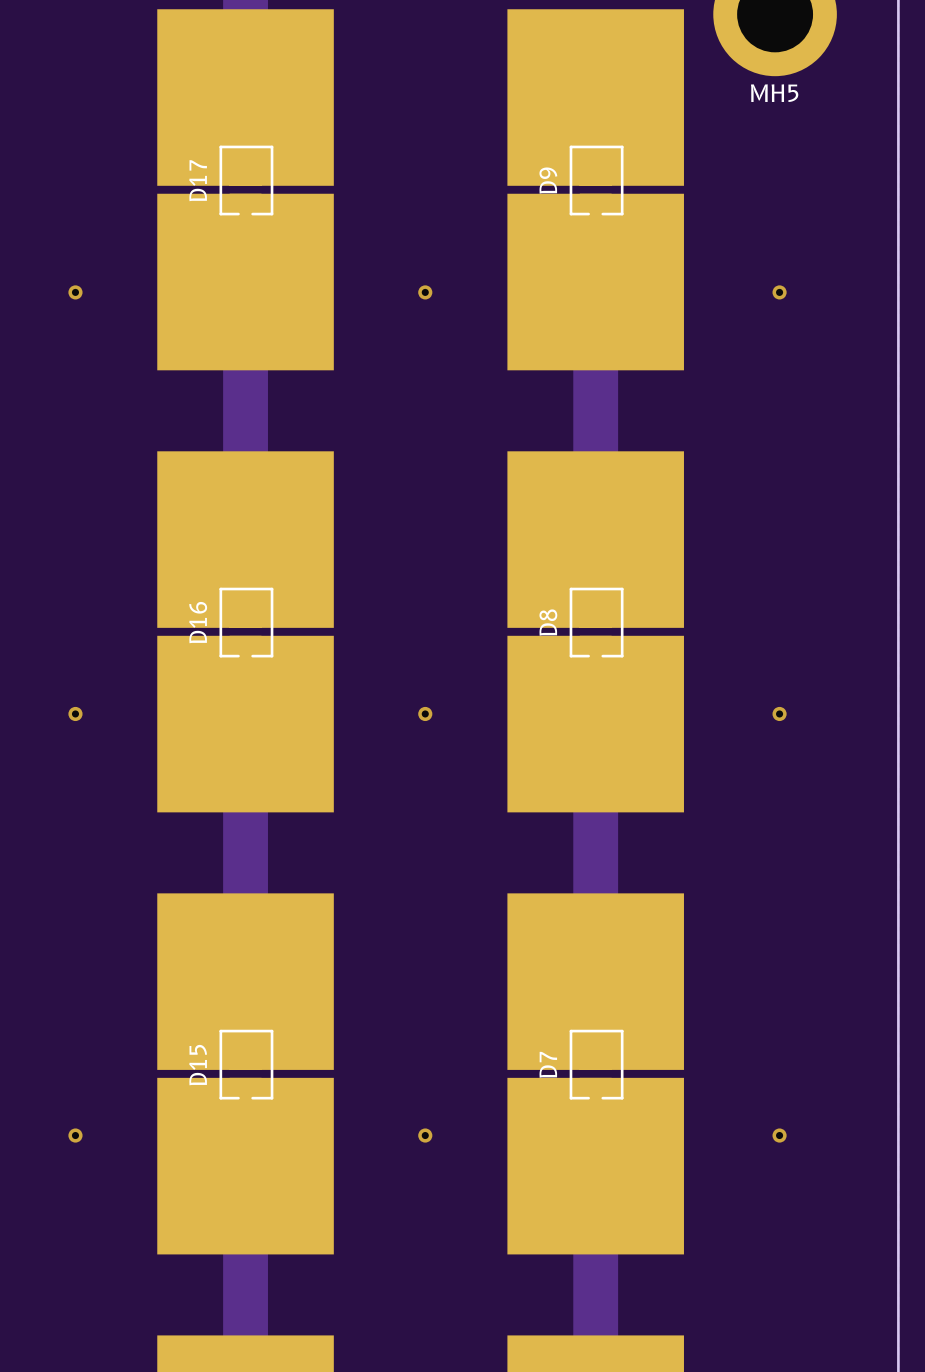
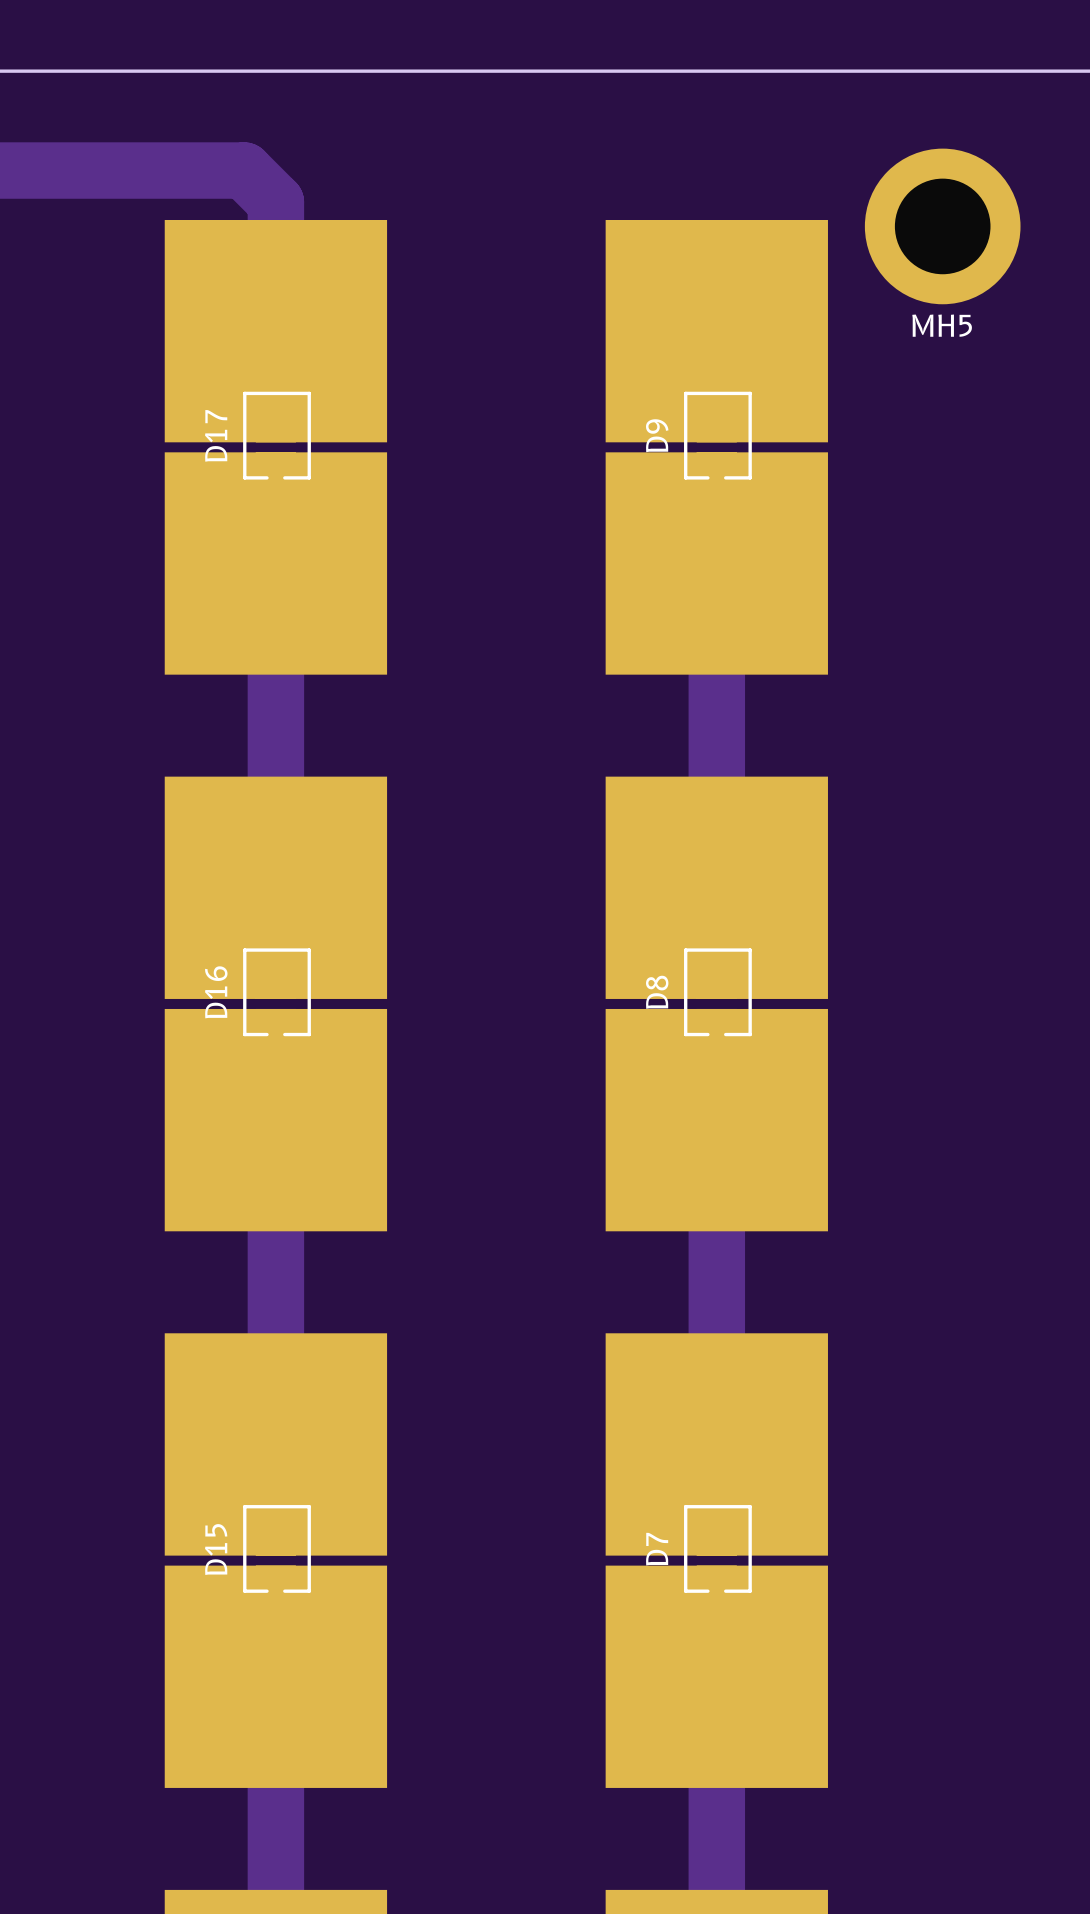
via: (75, 292) -> none
via: (425, 292) -> none
via: (779, 292) -> none
via: (75, 713) -> none
via: (425, 713) -> none
via: (779, 713) -> none
via: (75, 1135) -> none
via: (425, 1135) -> none
via: (779, 1135) -> none

